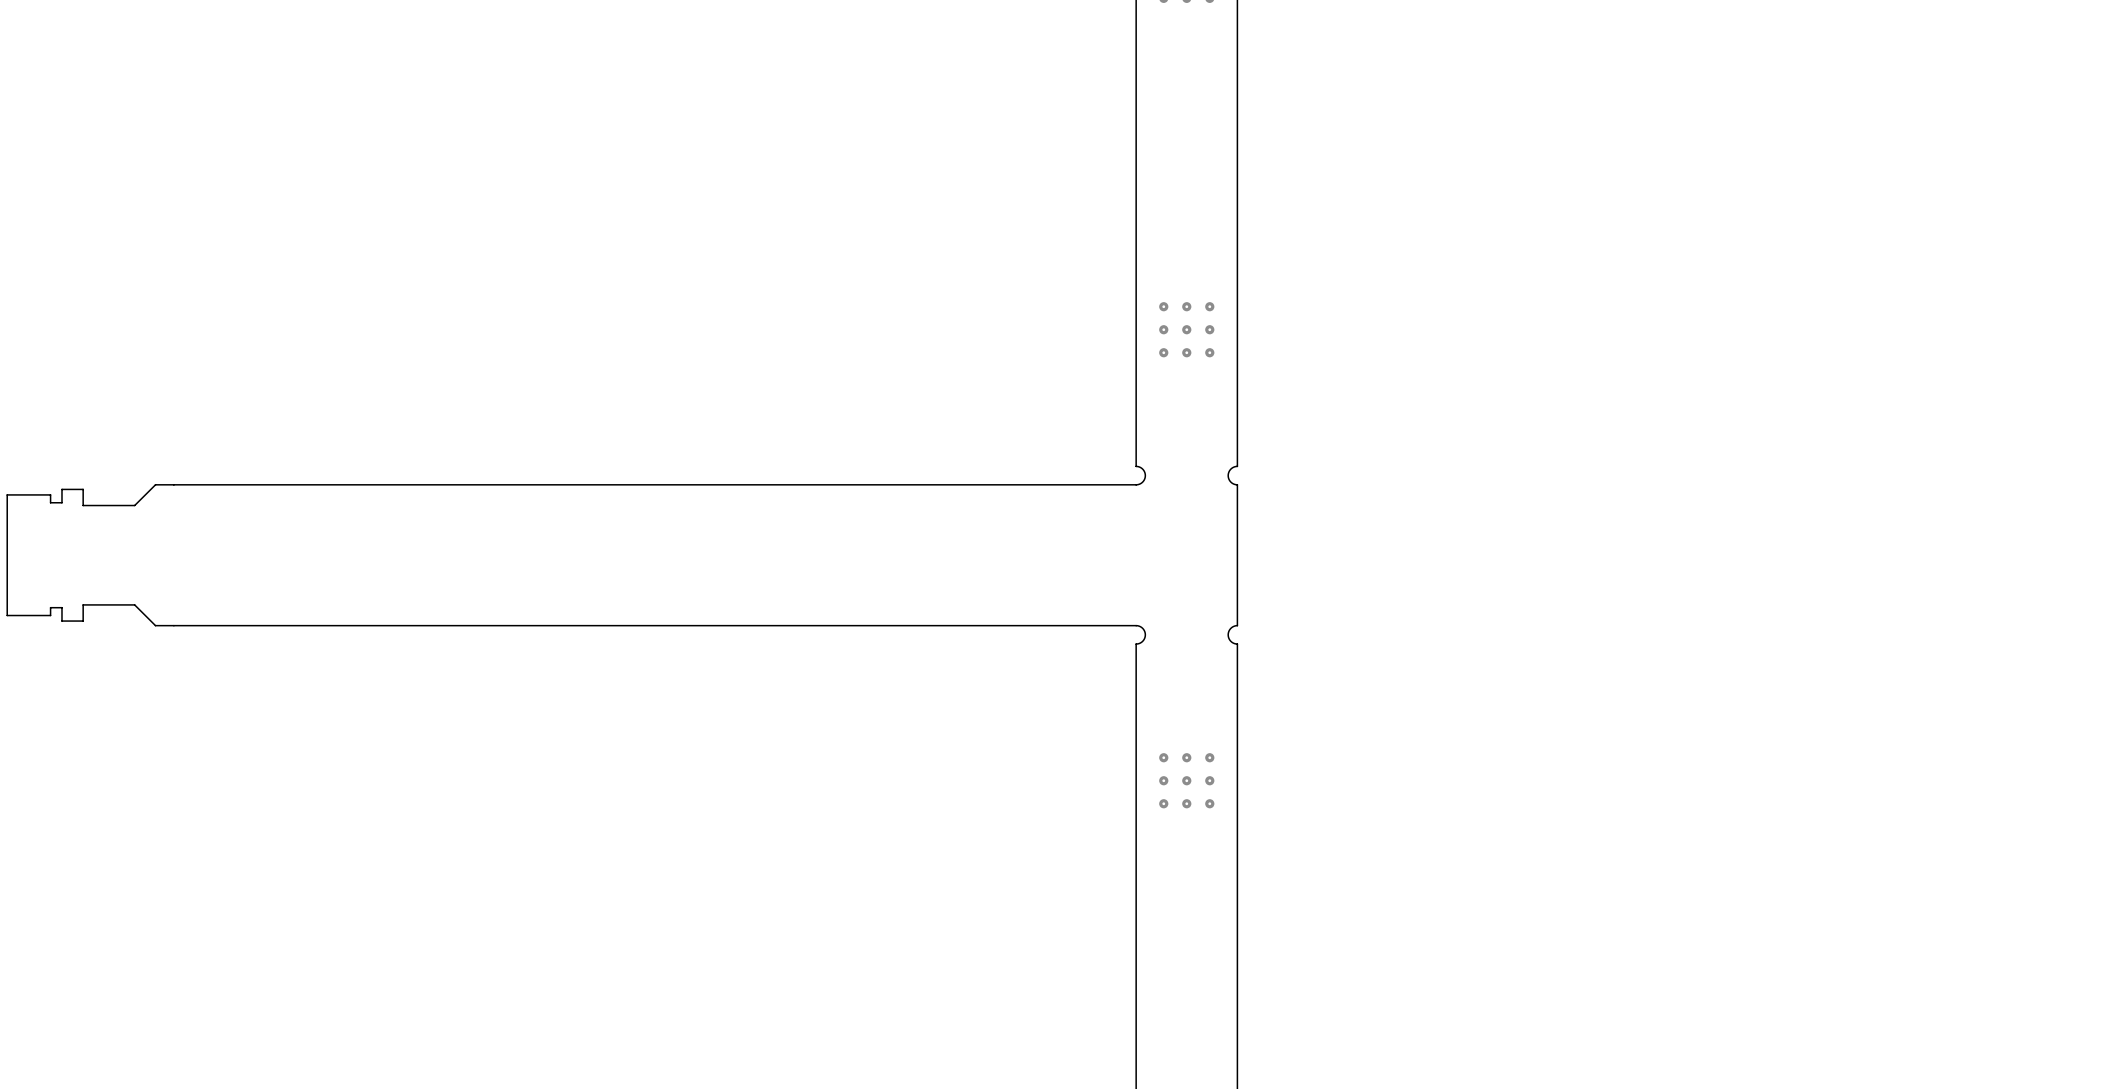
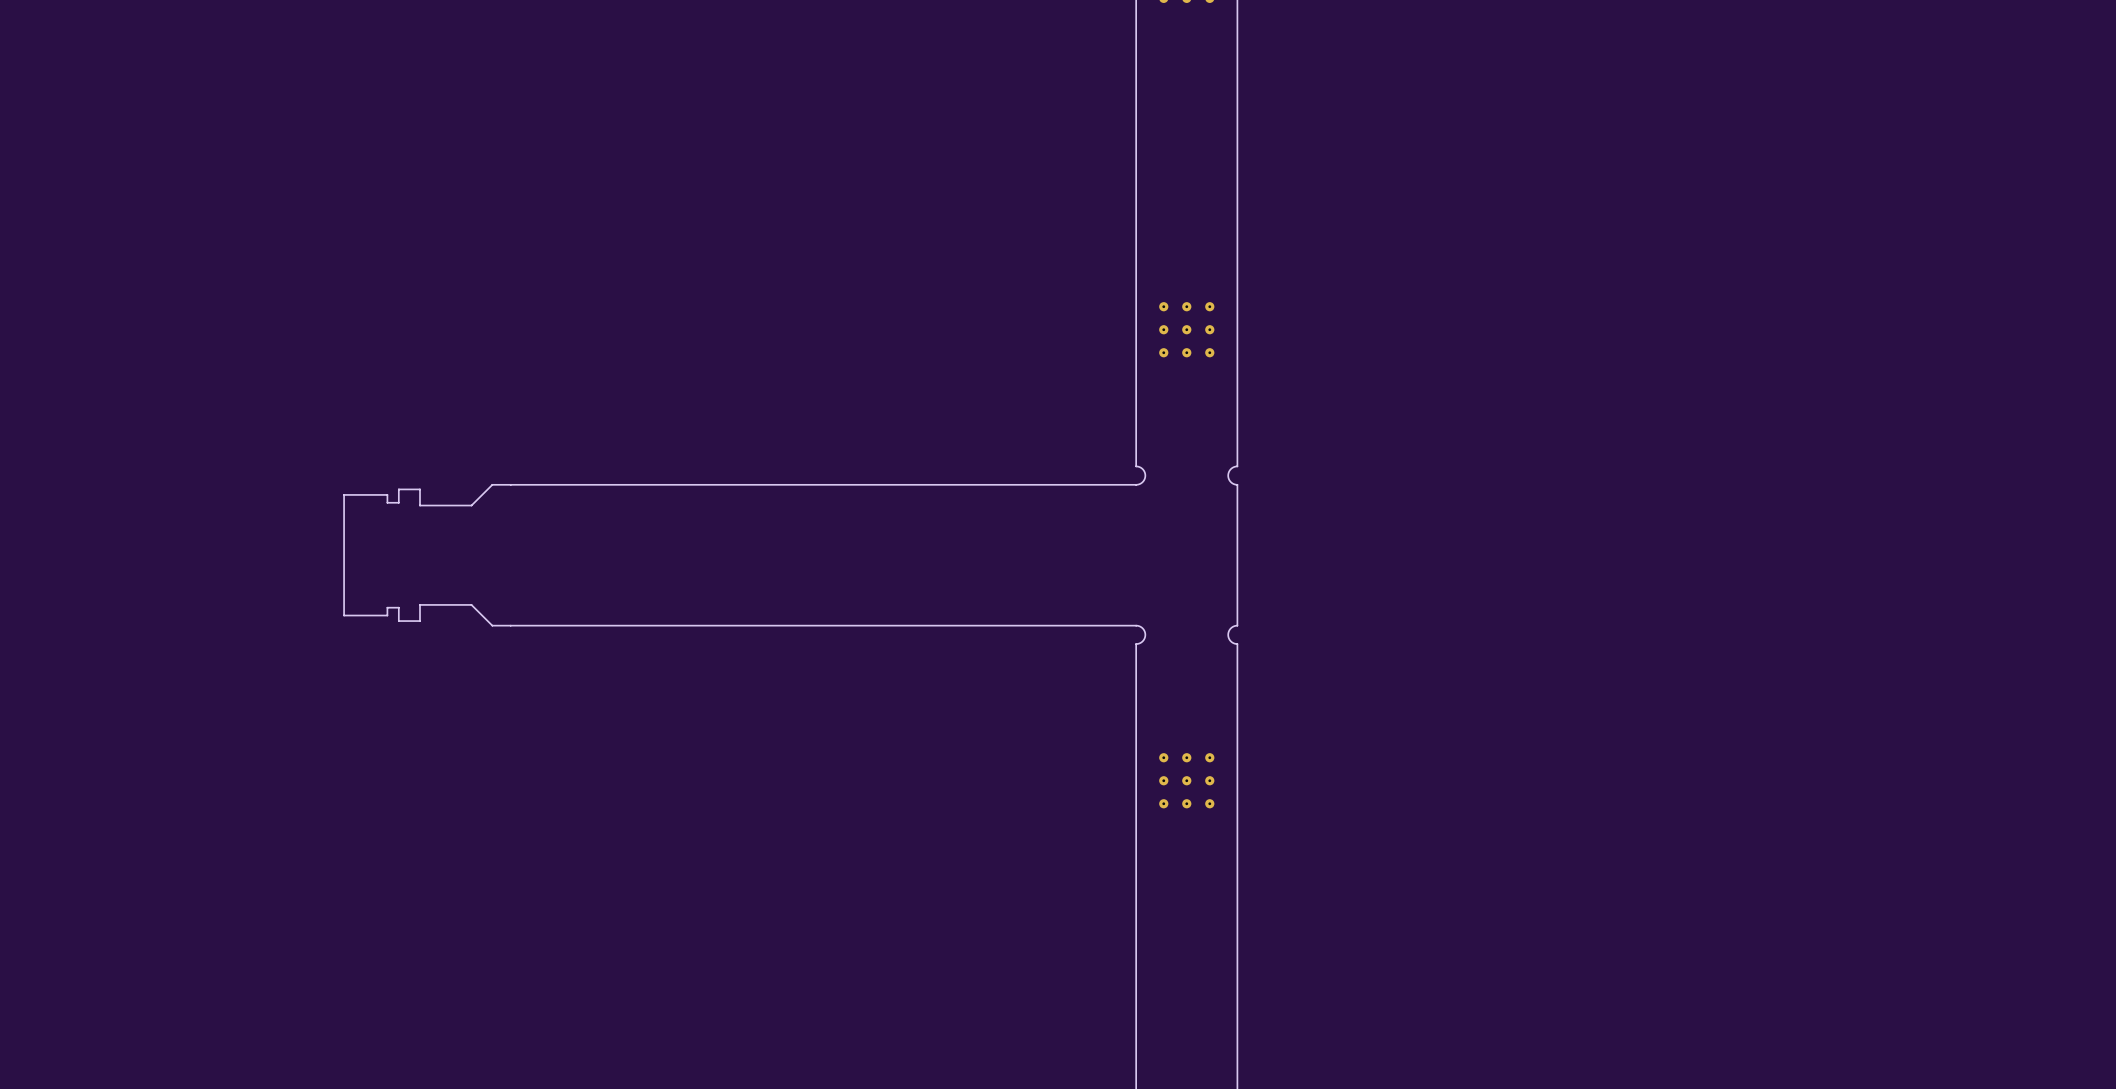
board edge: (510, 484) (173, 484) -> none
part: (90, 555) -> none
part: none -> (427, 555)
board edge: (510, 625) (173, 625) -> none

